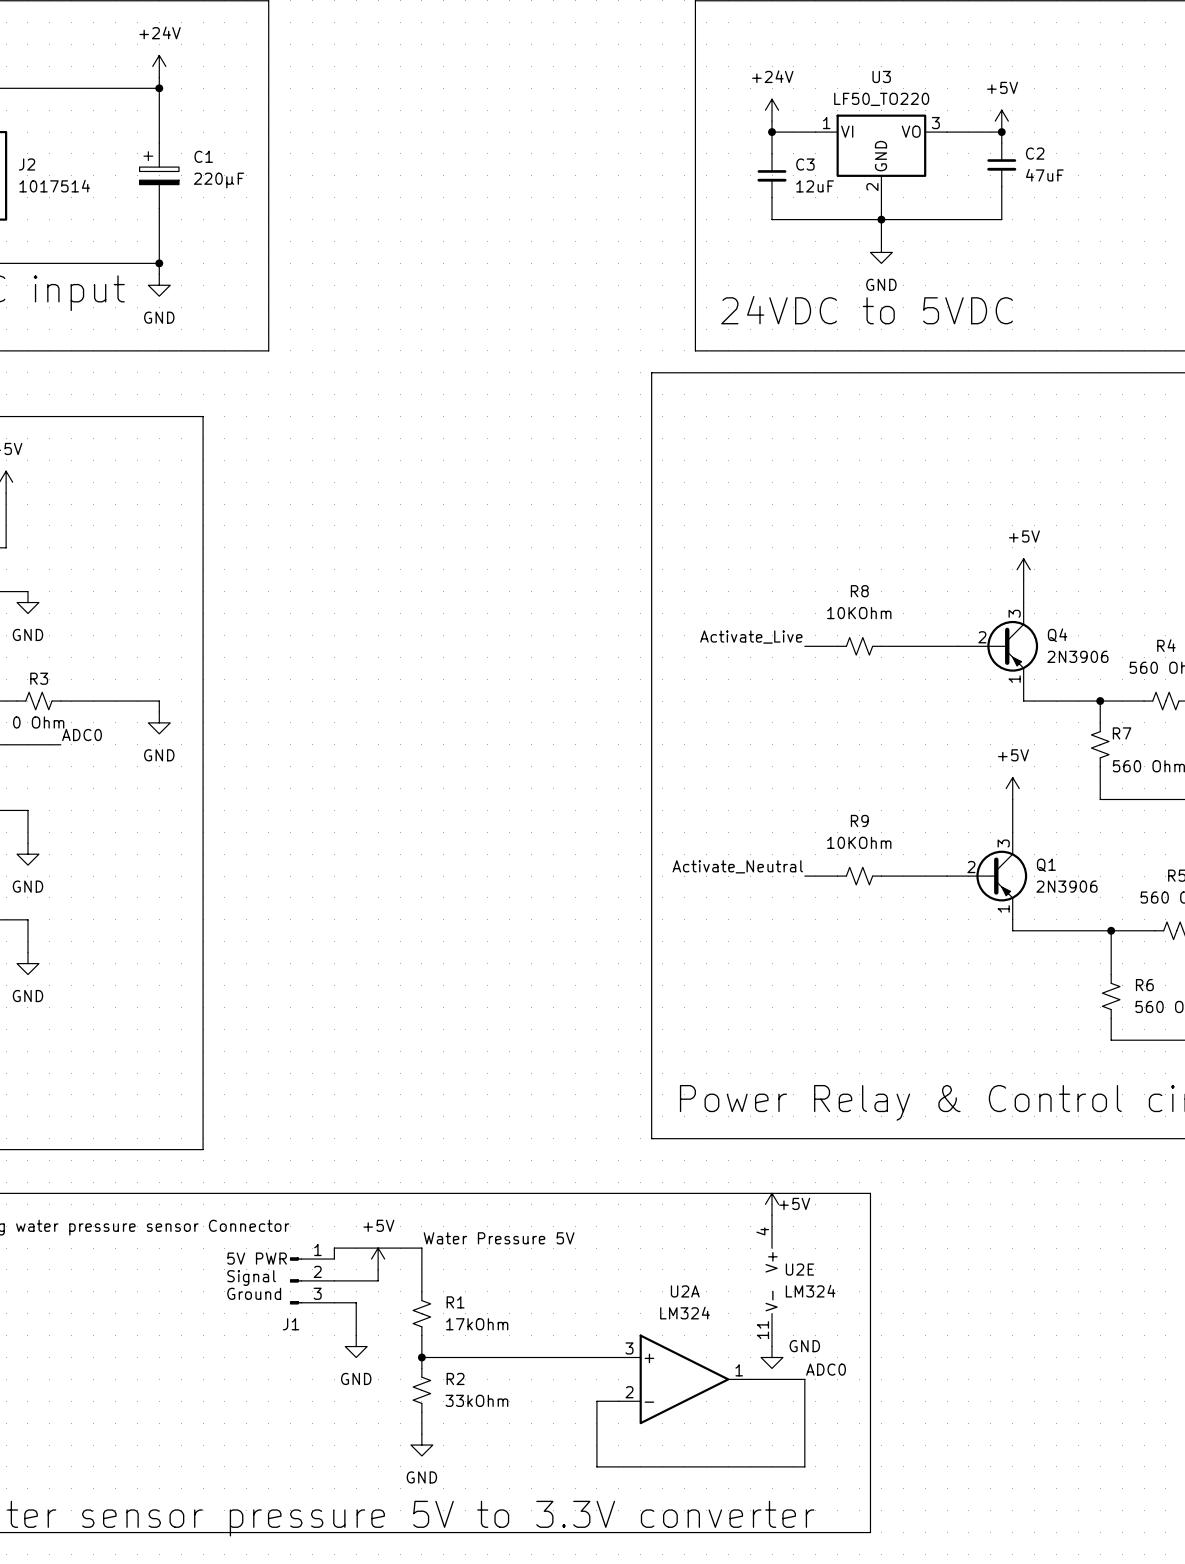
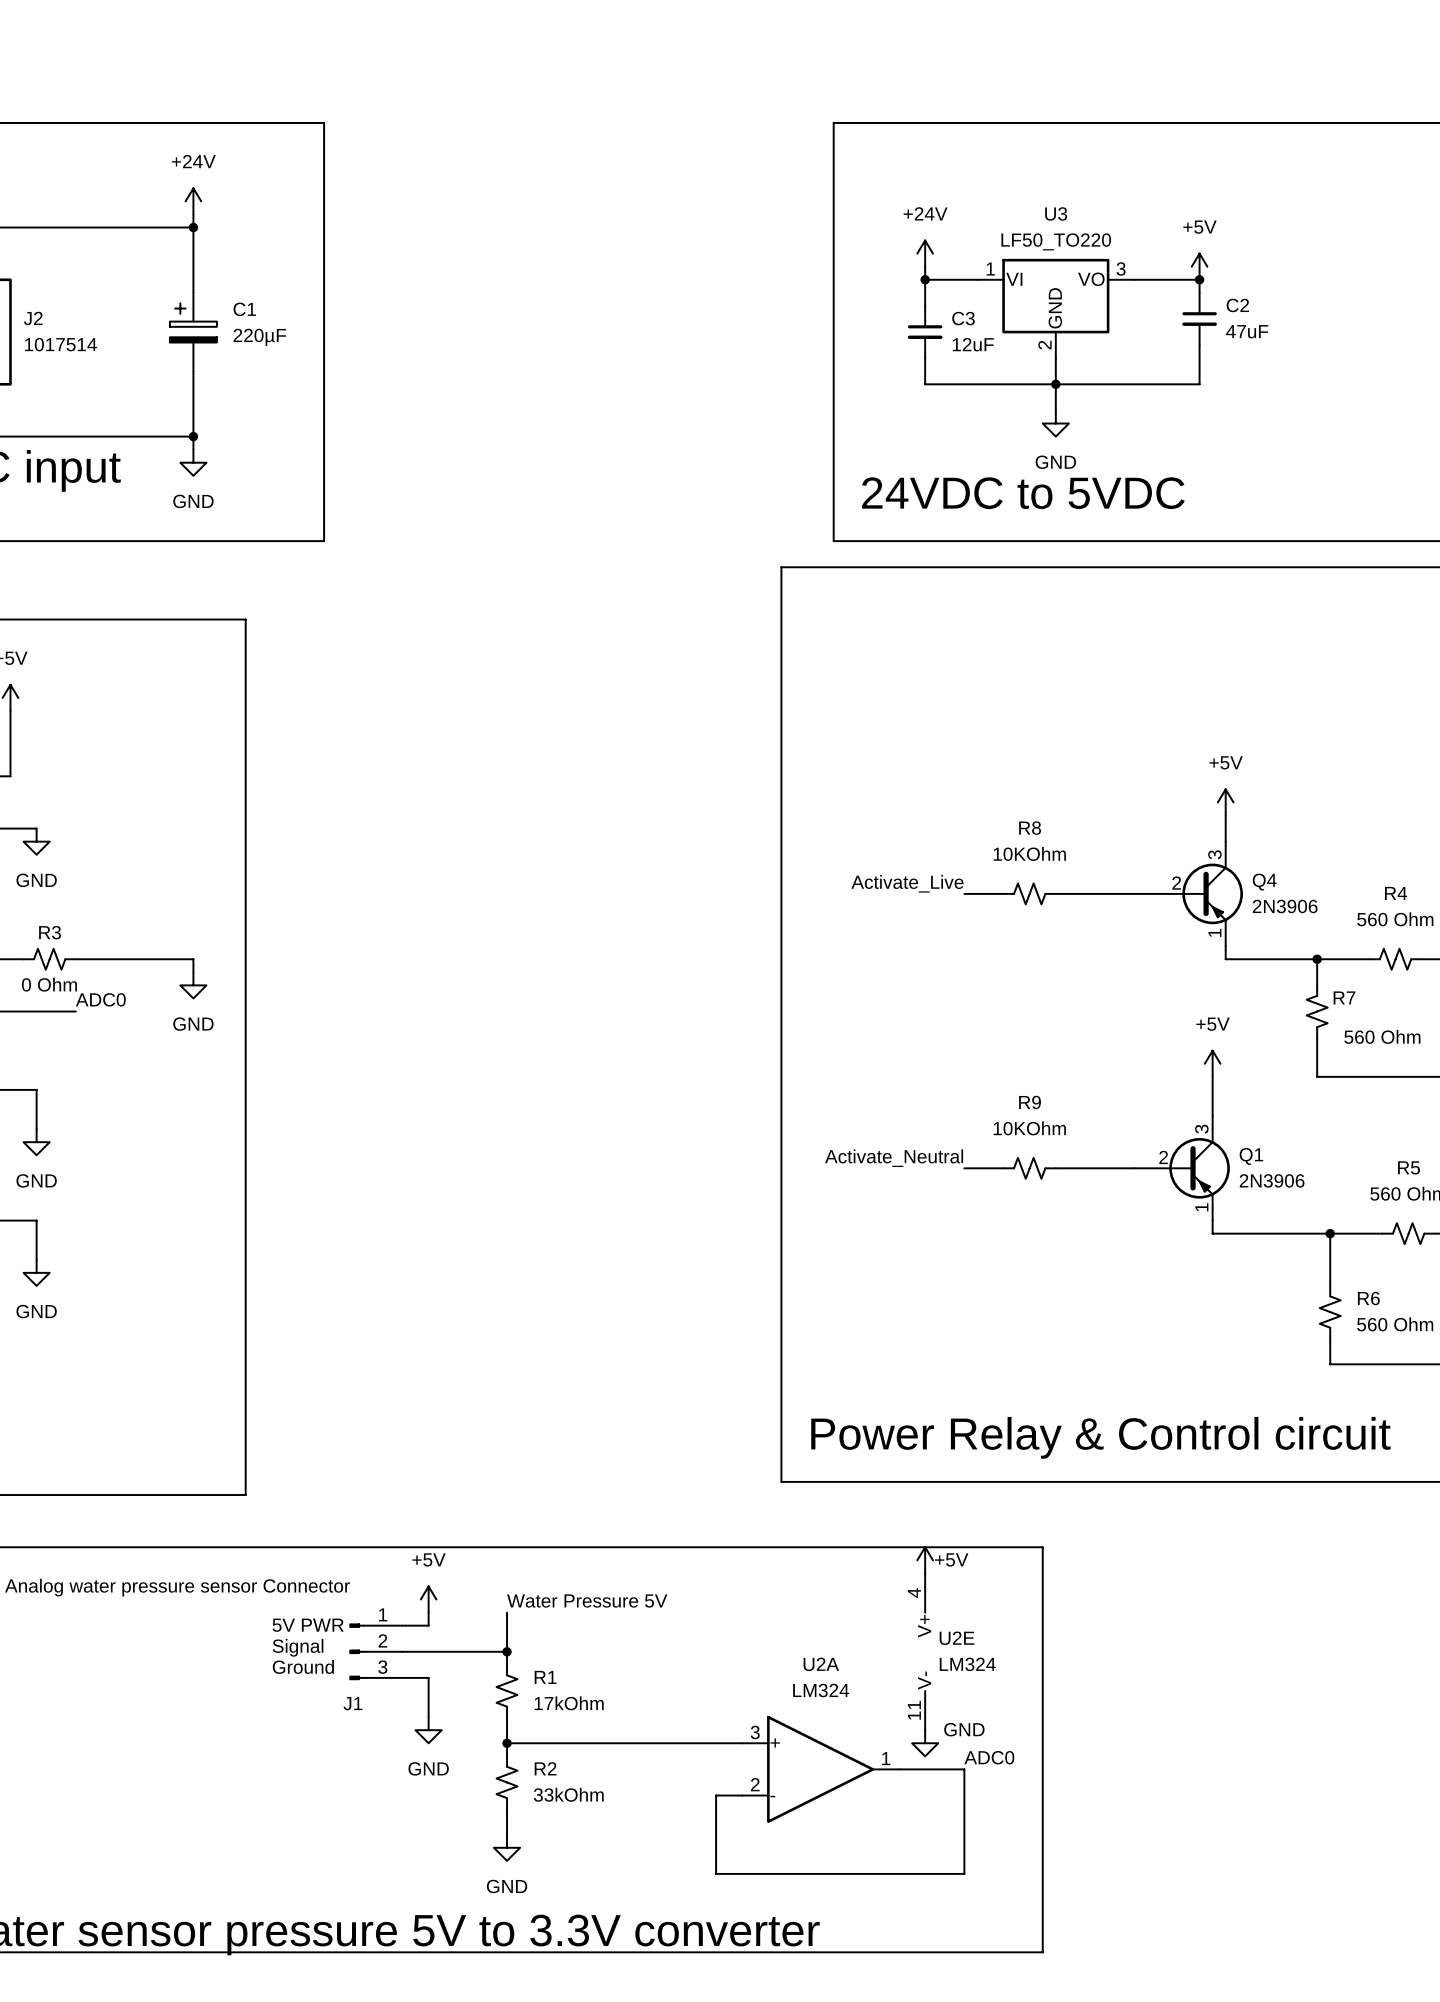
wire: (421, 1248) (334, 1248) (334, 1259) -> (428, 1612) (428, 1625) (402, 1625)
power symbol position: +5V (378, 1259) -> +5V (428, 1599)
wire: (378, 1269) (378, 1280) -> (507, 1651) (454, 1651)
junction: none -> (507, 1651)

